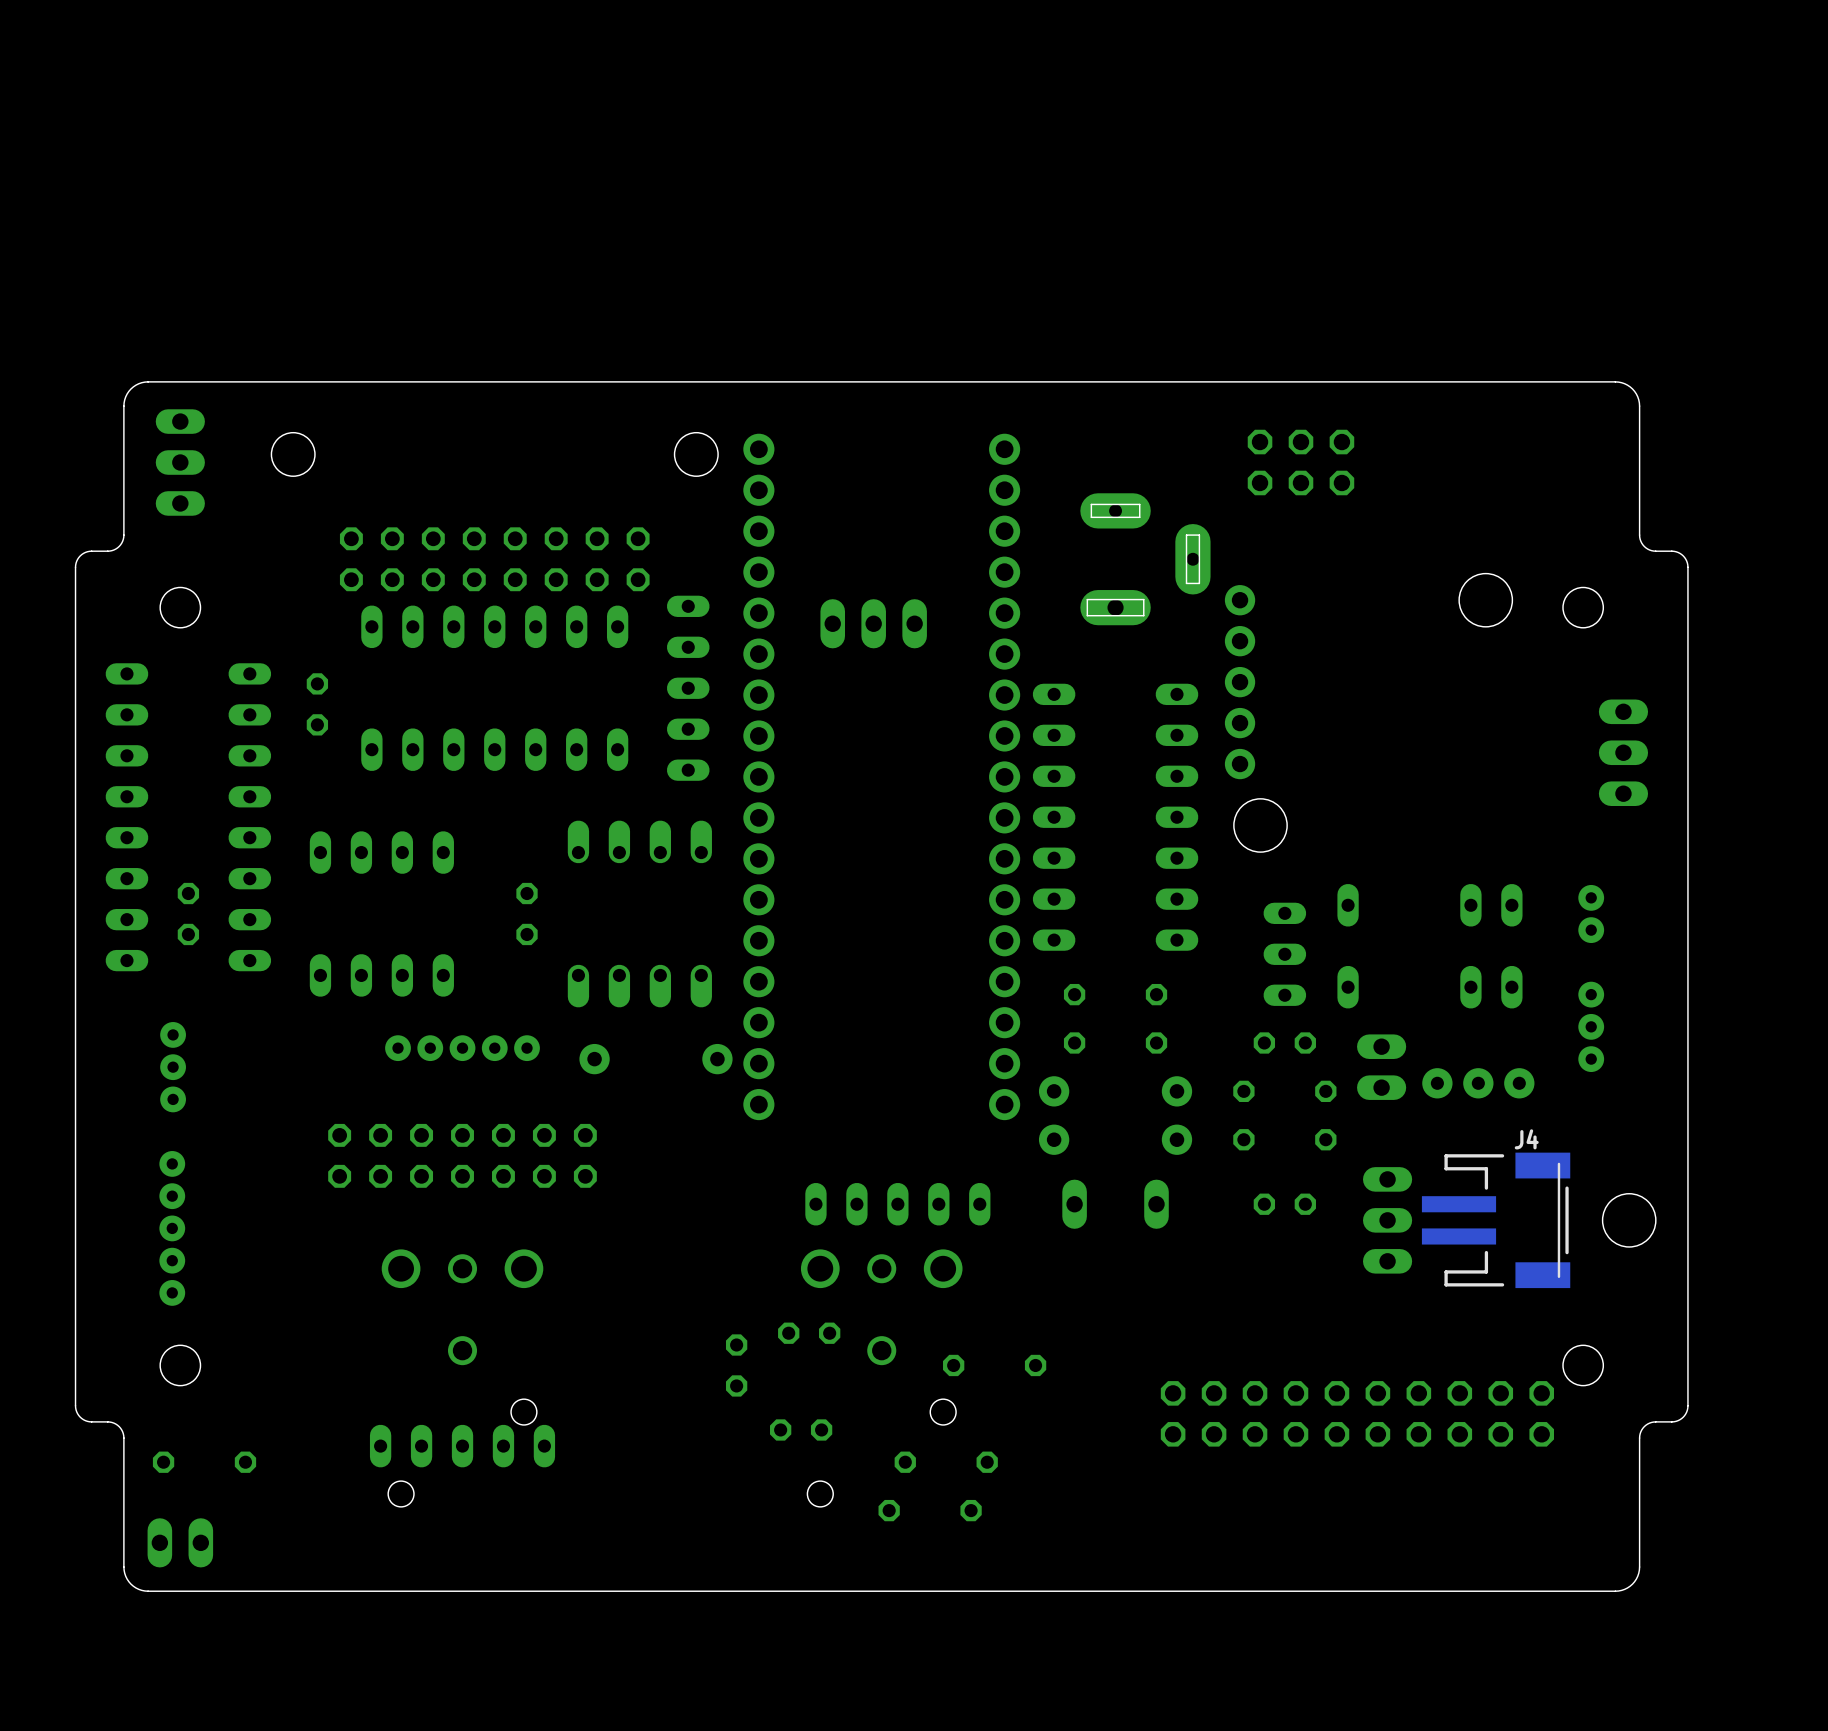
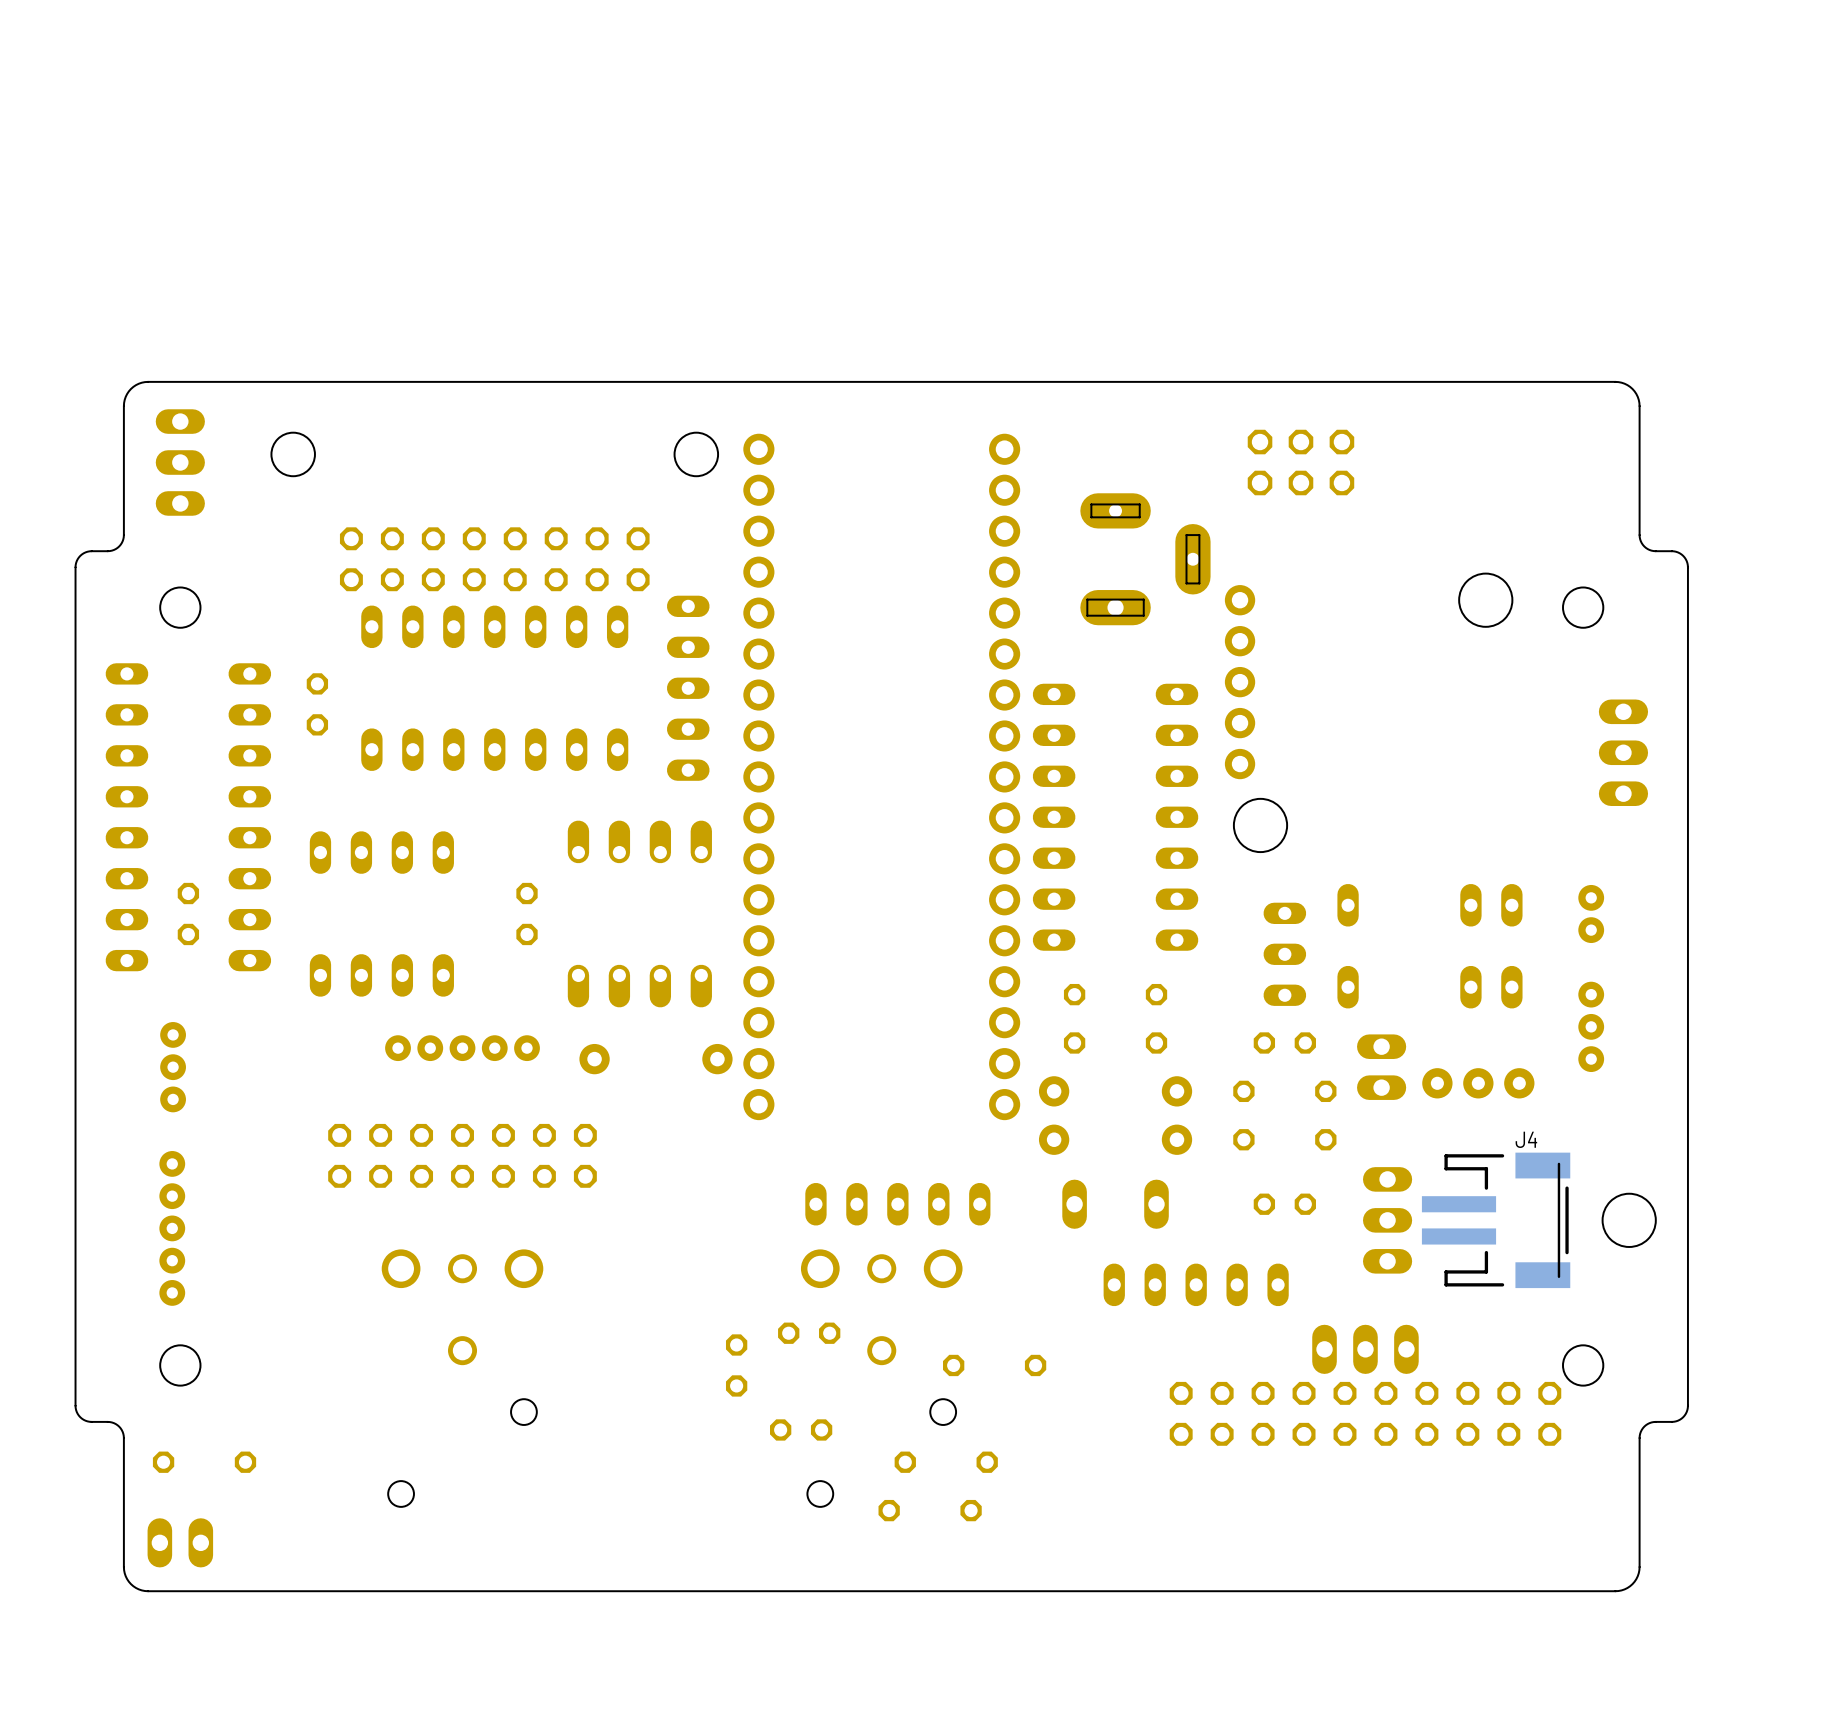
part: (873, 623) -> none
part: none -> (1196, 1284)
part: none -> (1365, 1349)
part footprint: [1160, 1381, 1555, 1447] -> [1169, 1381, 1562, 1446]
part: (462, 1446) -> none

